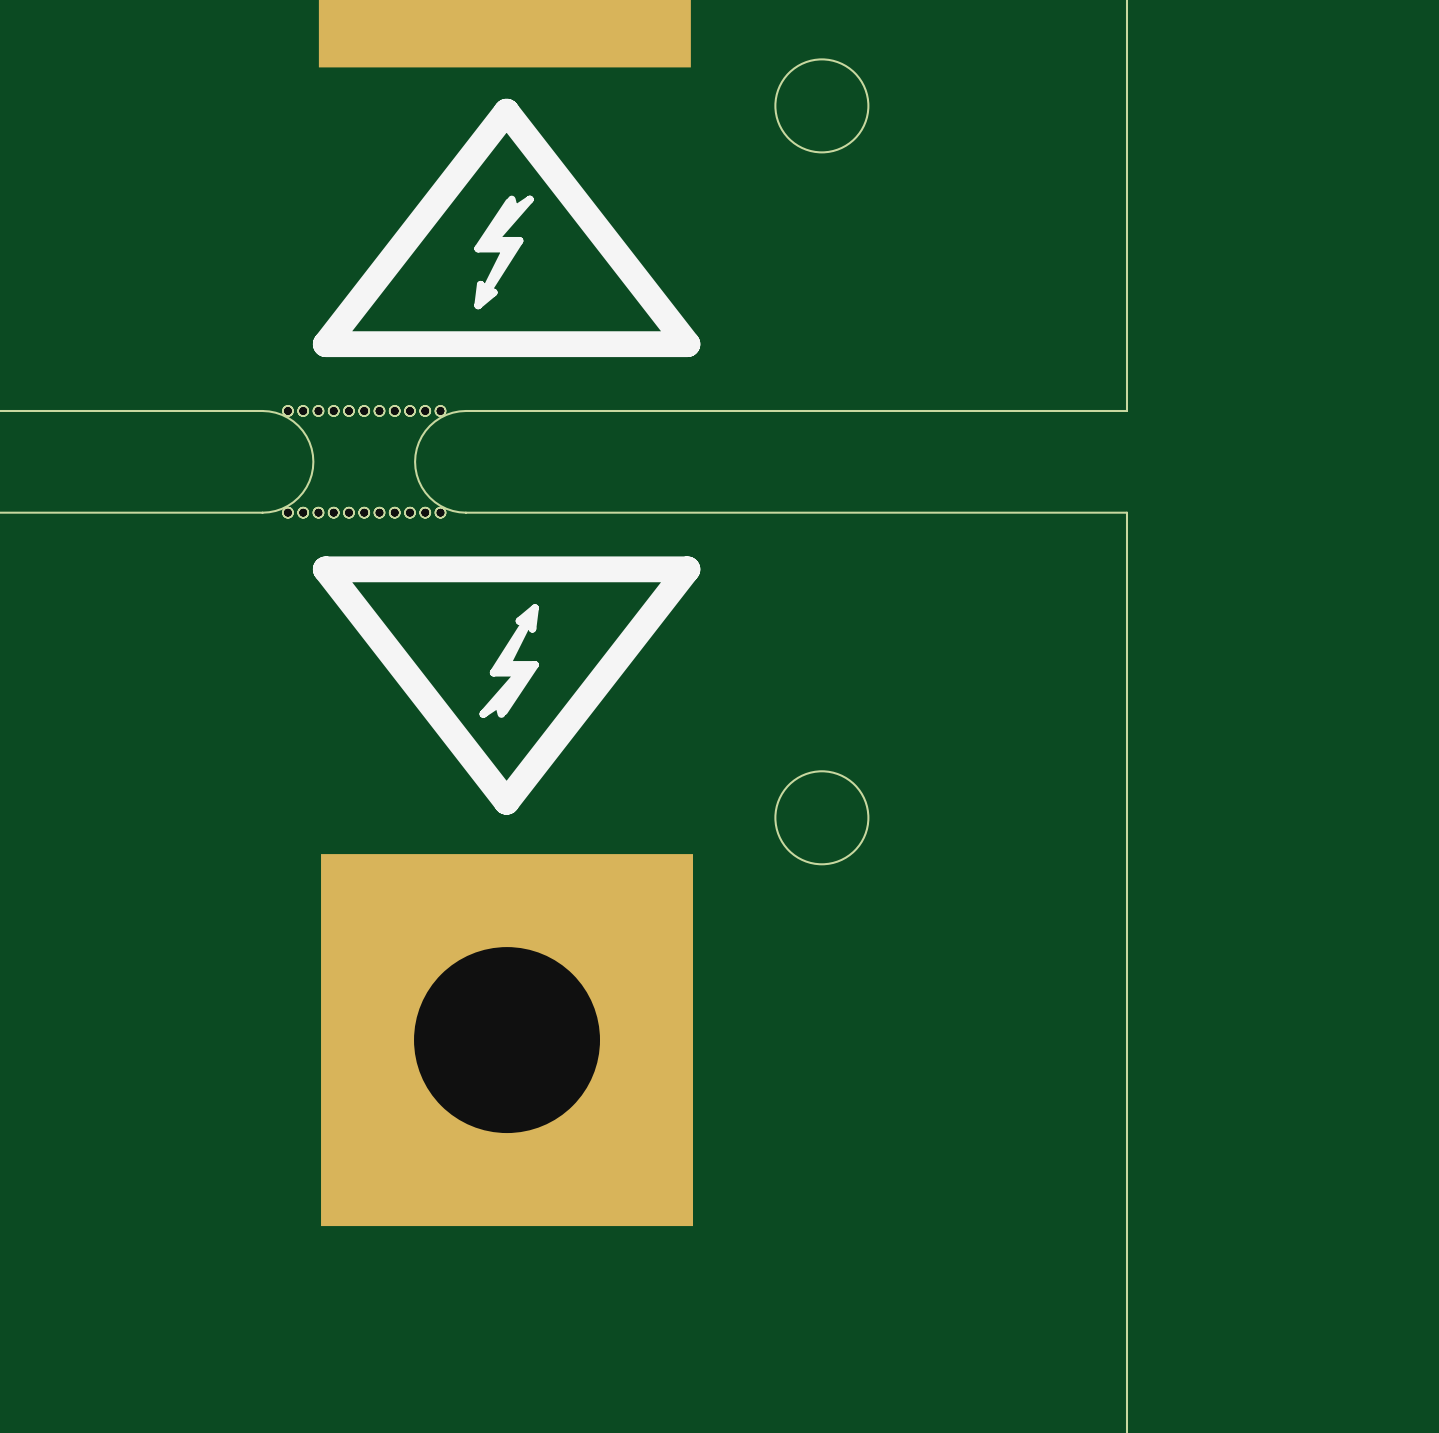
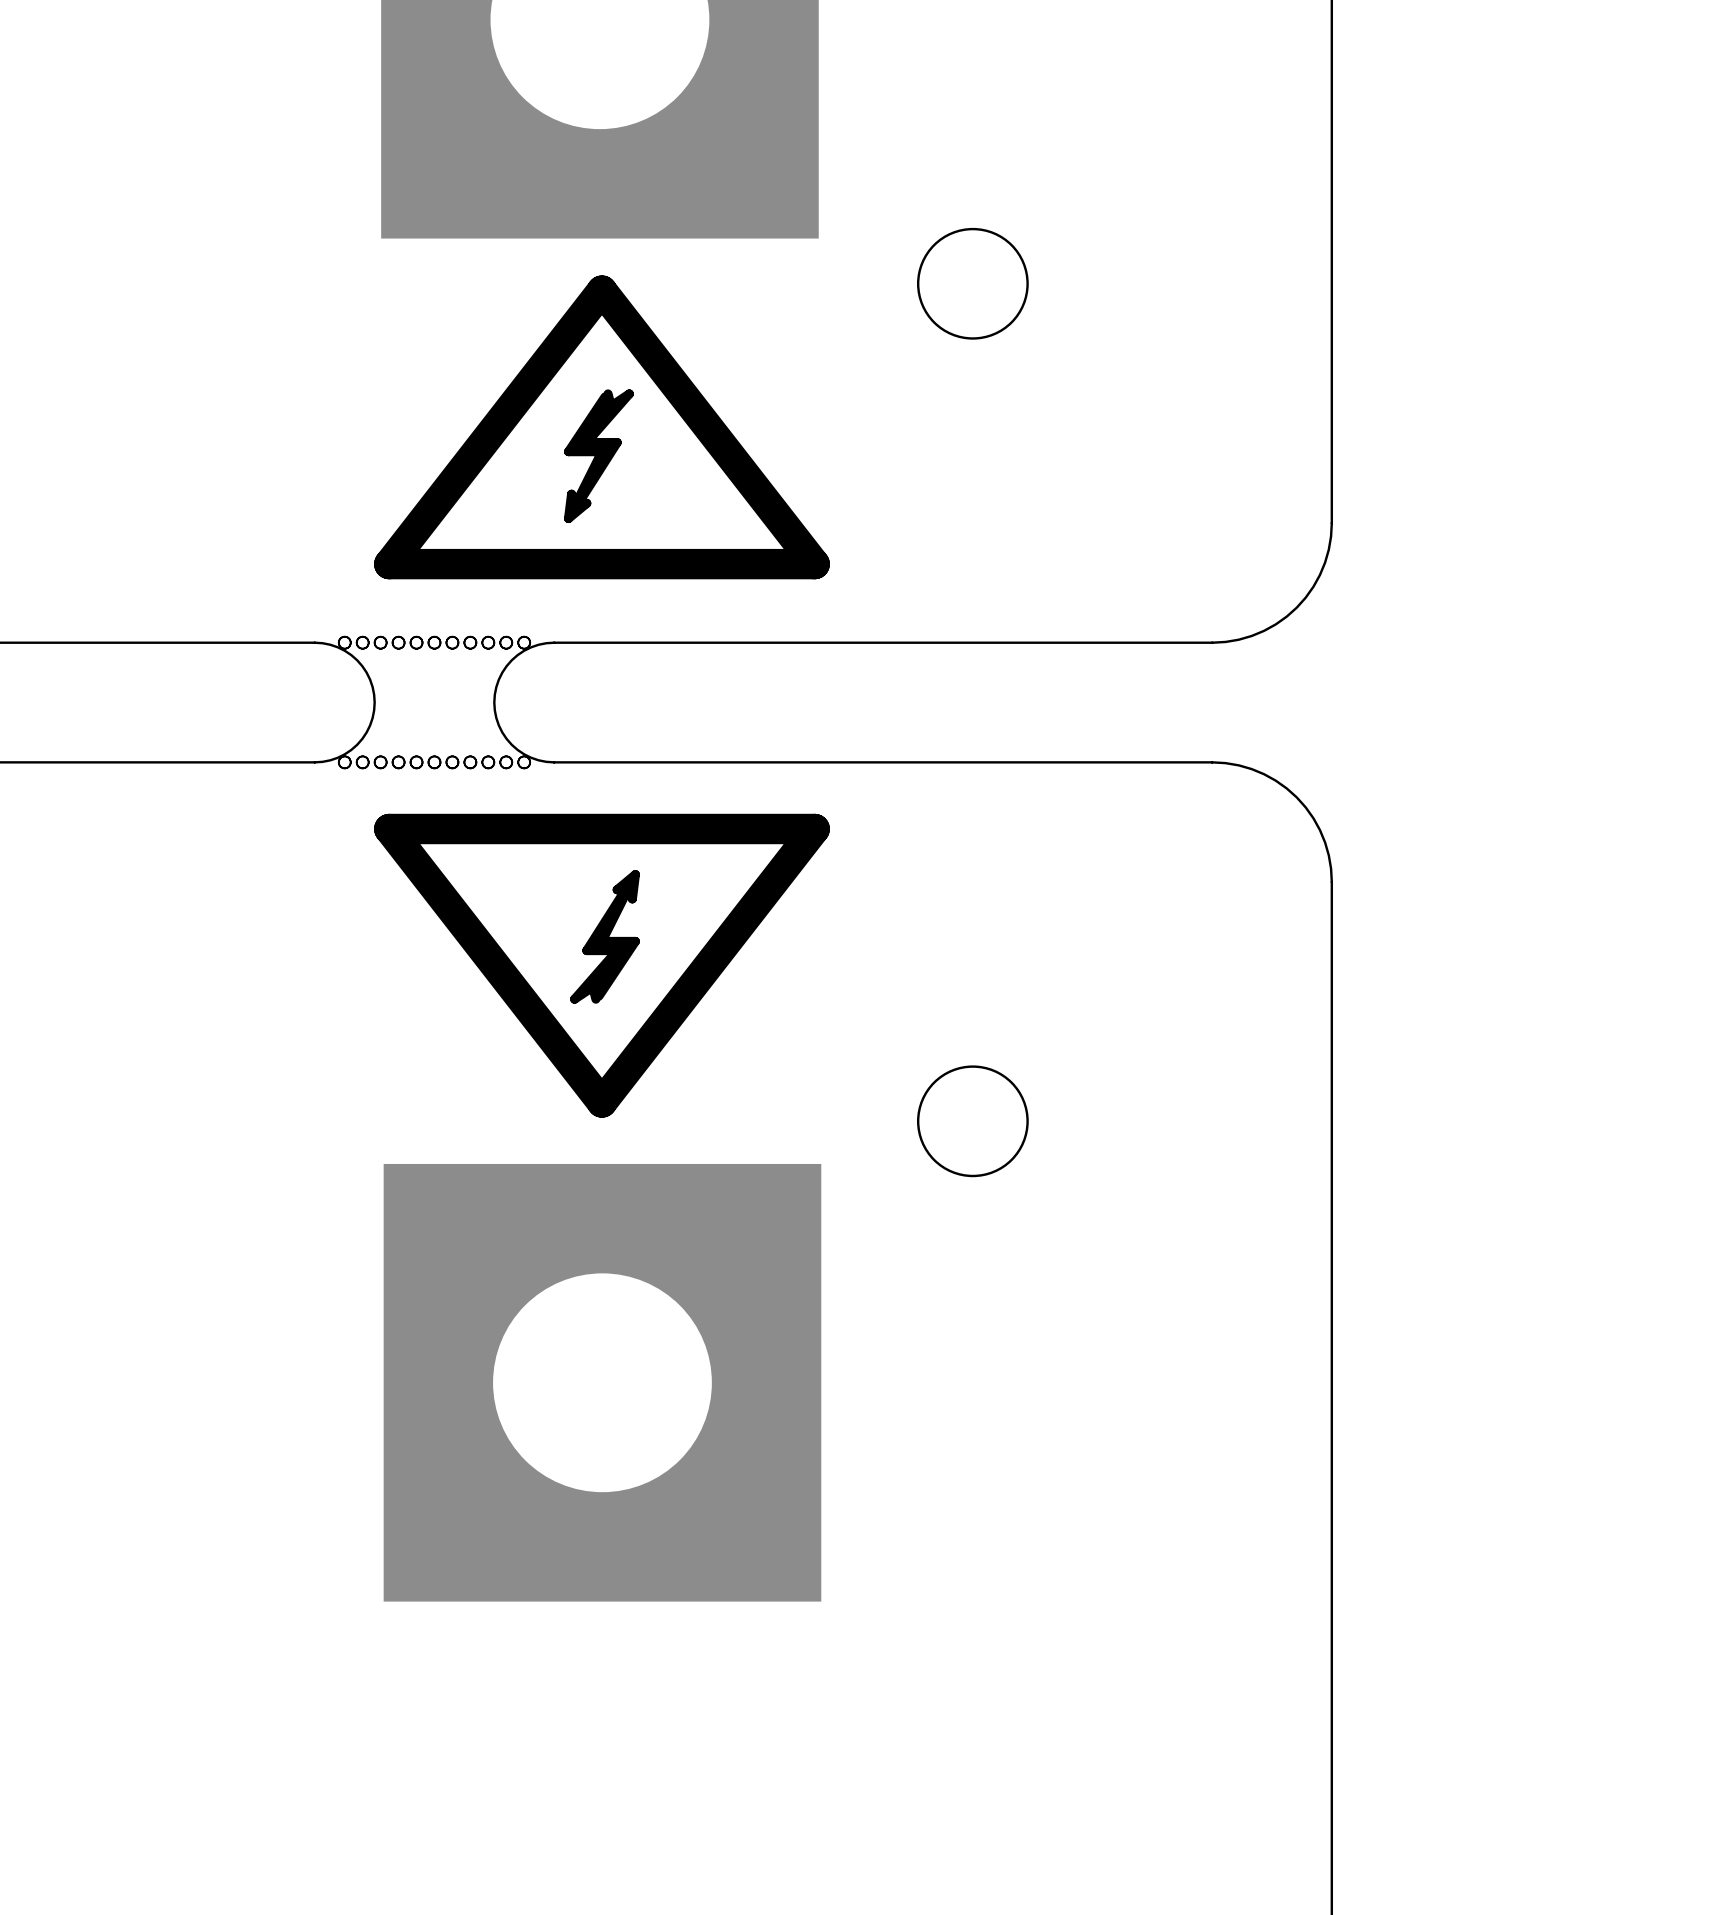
board edge: (1126, 309) (1126, 410) (1025, 410) -> (1331, 523) (1331, 536) (1325, 562) (1313, 586) (1296, 607) (1275, 624) (1251, 636) (1238, 639) (1212, 642)
board edge: (1025, 512) (1126, 512) (1126, 614) -> (1212, 762) (1225, 763) (1251, 769) (1275, 780) (1296, 797) (1313, 818) (1325, 842) (1331, 868) (1331, 882)

